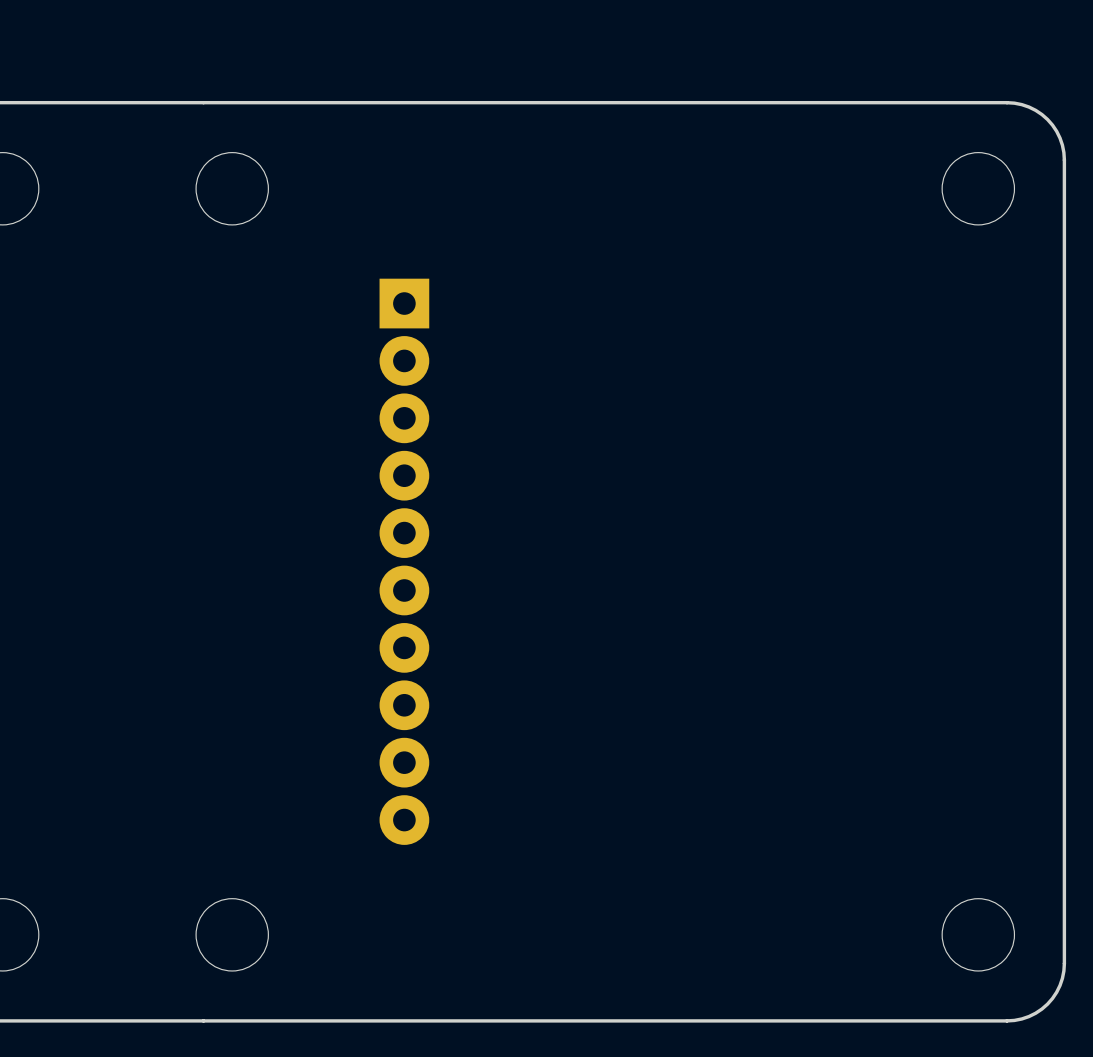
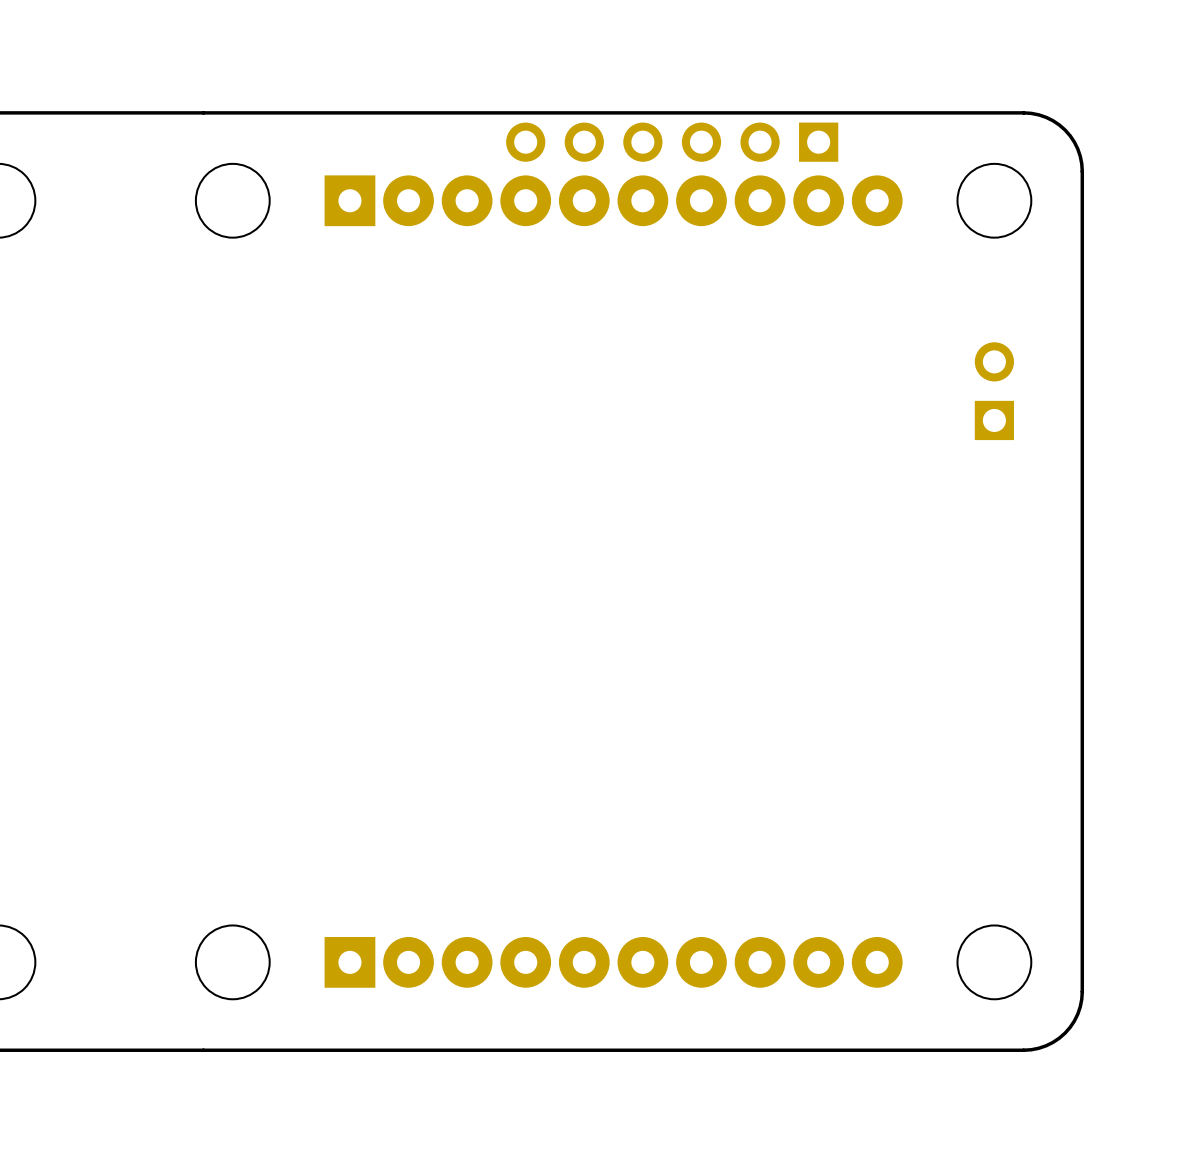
part: none -> (672, 142)
part: none -> (613, 200)
part: none -> (994, 391)
part: (404, 561) -> none
part: none -> (613, 962)

